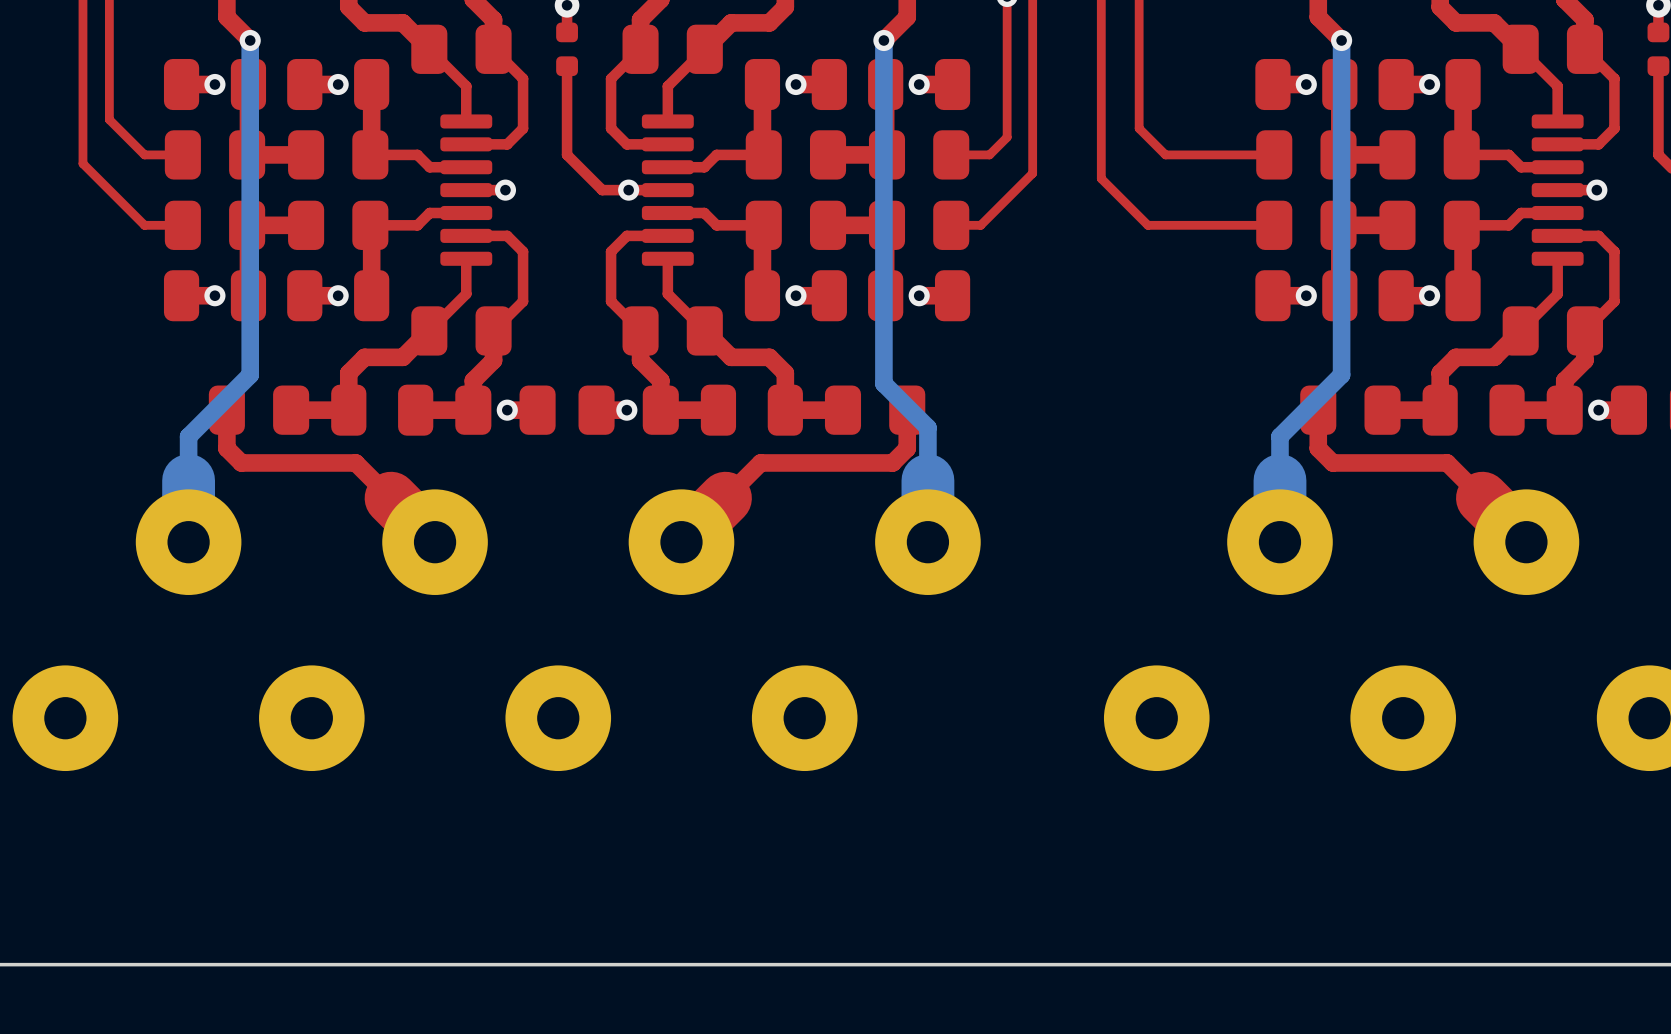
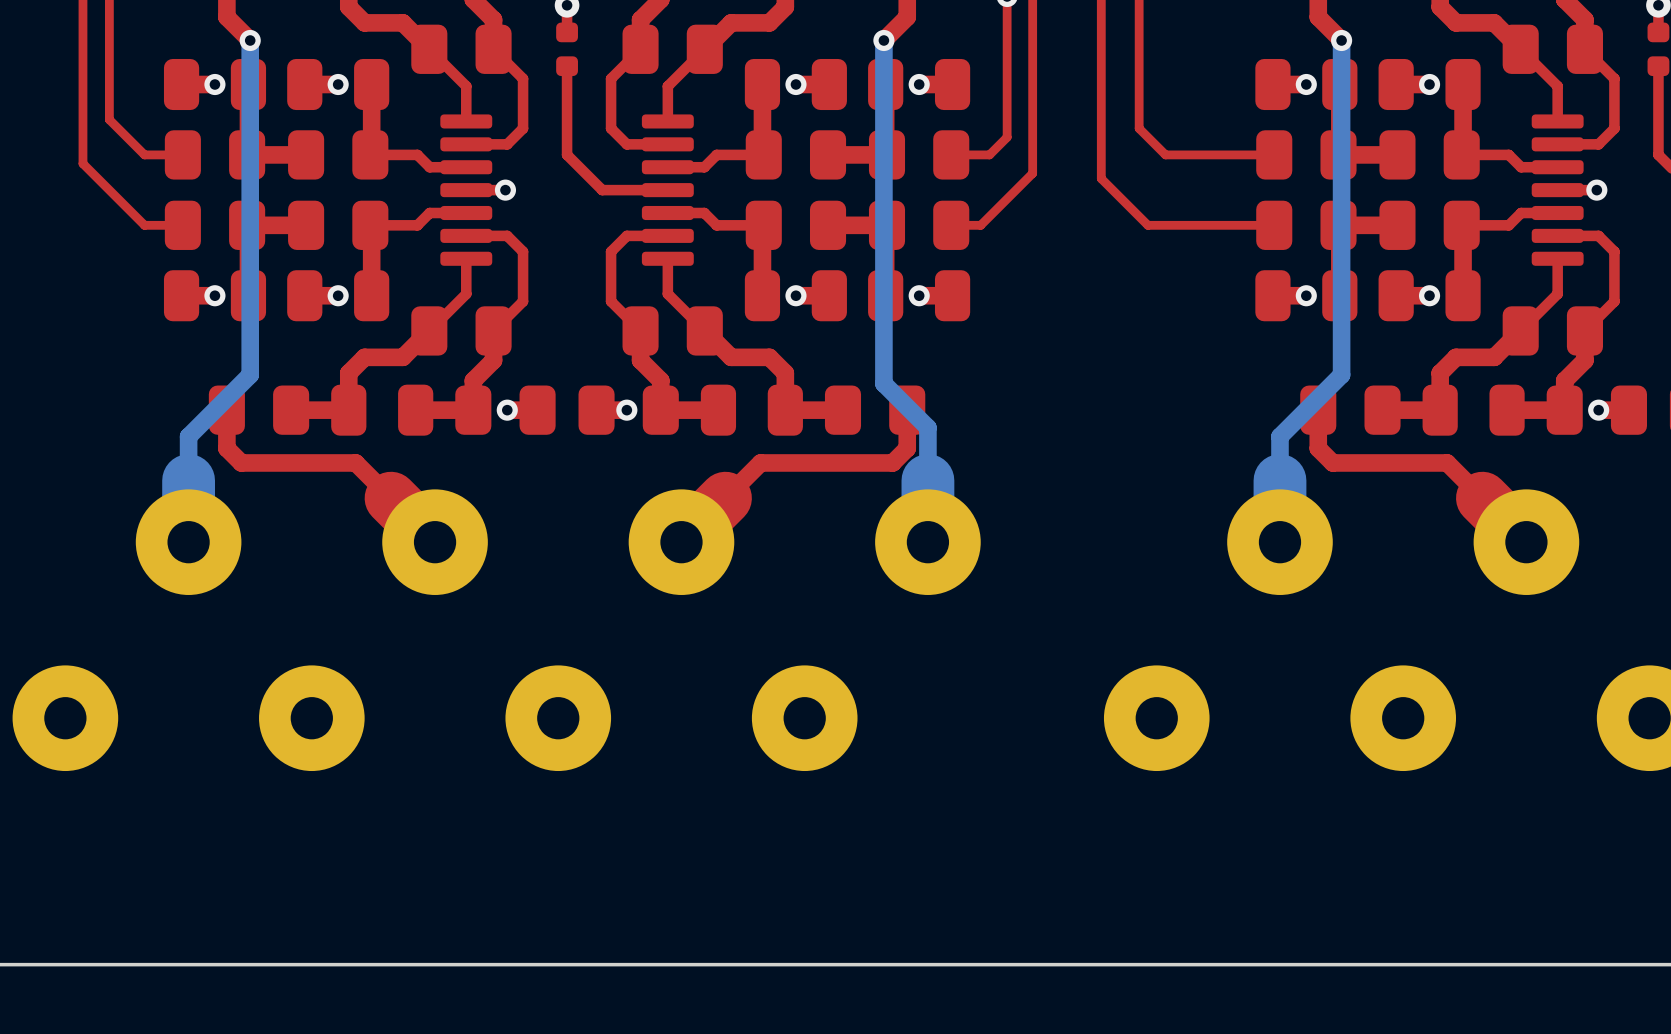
via: (628, 190) -> none

